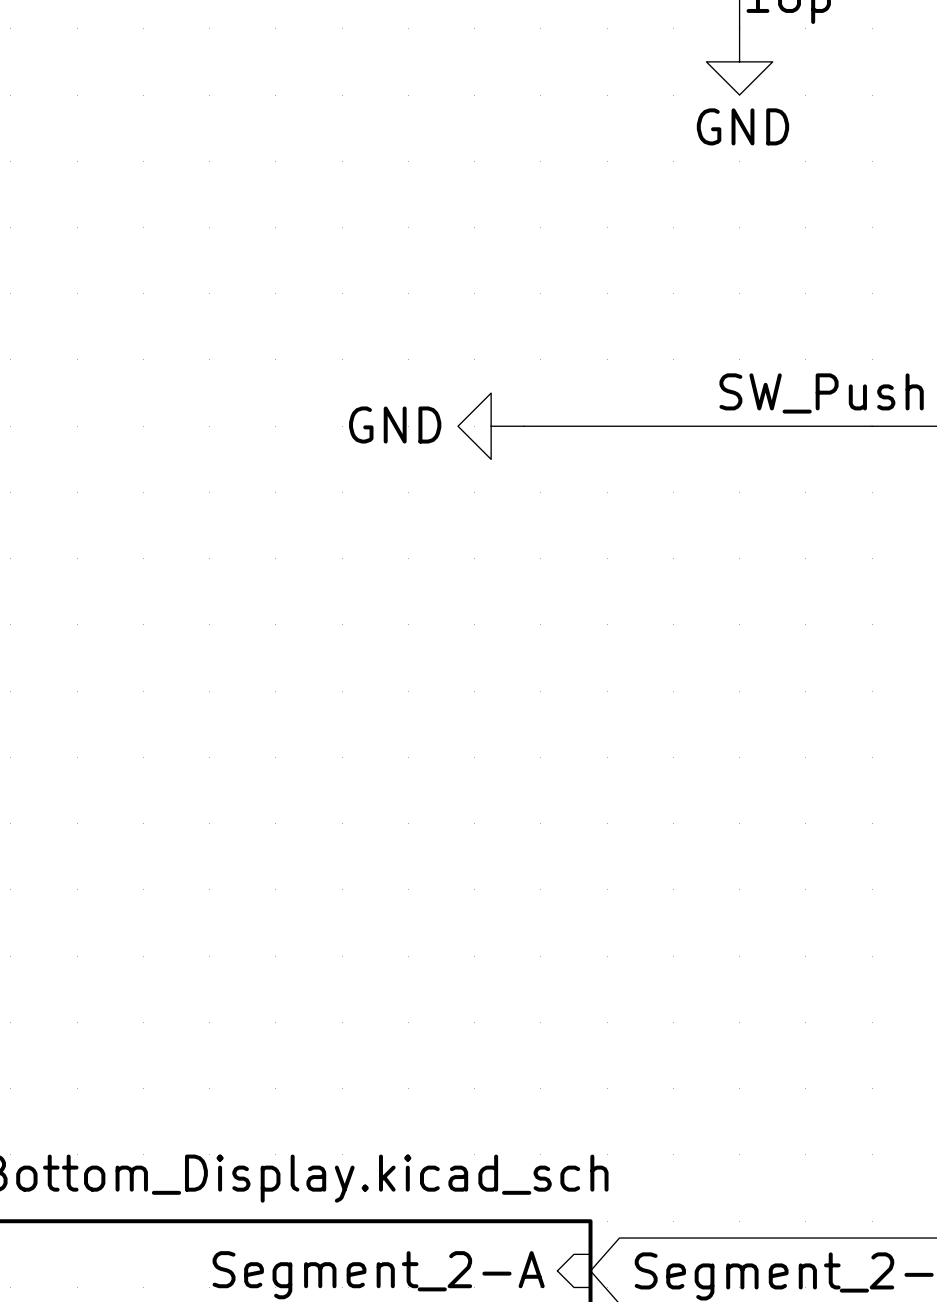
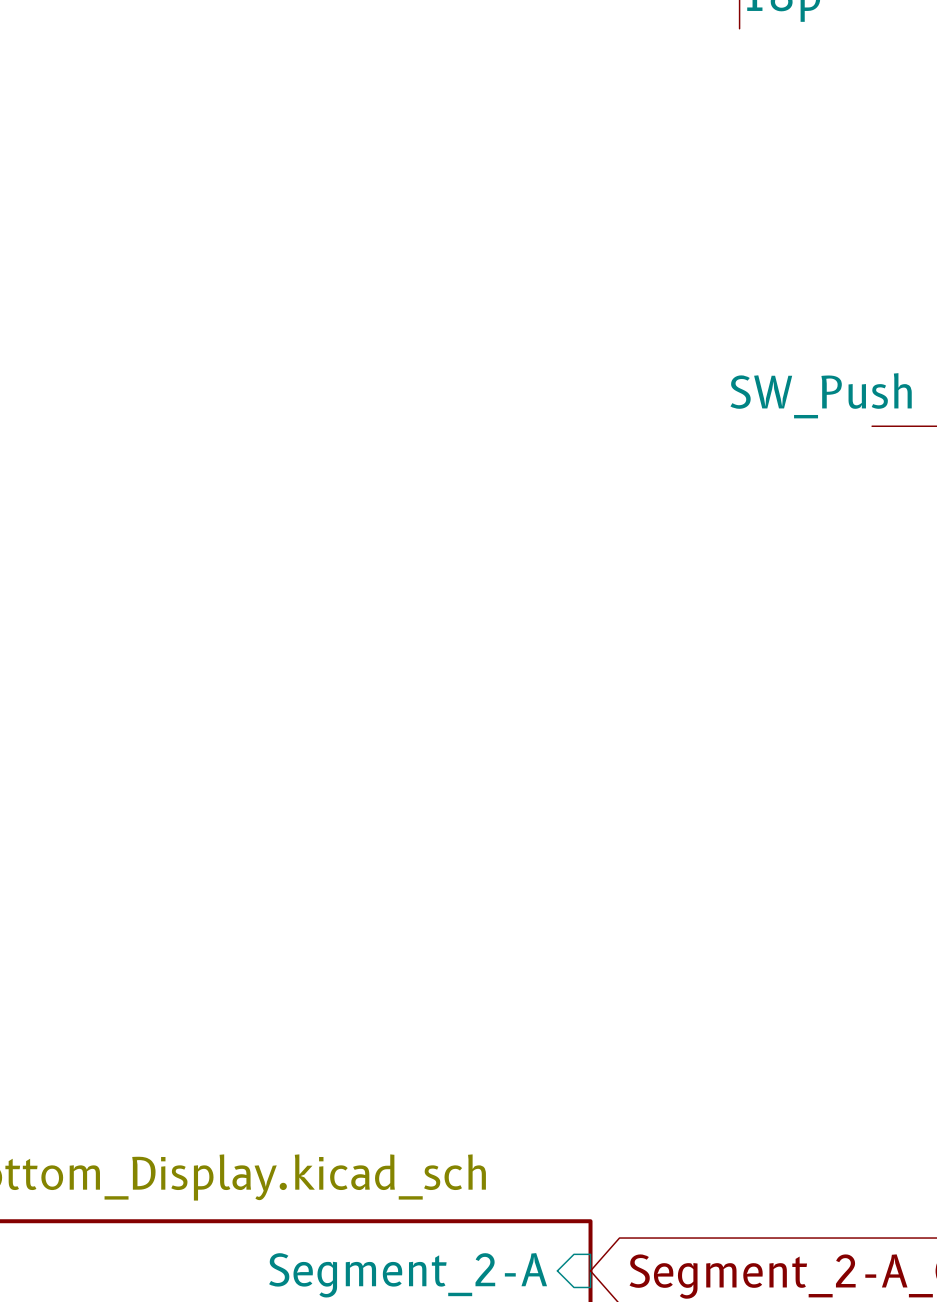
power symbol: GND (739, 61) -> none
power symbol: GND (491, 426) -> none
wire: (524, 426) (872, 426) -> none

